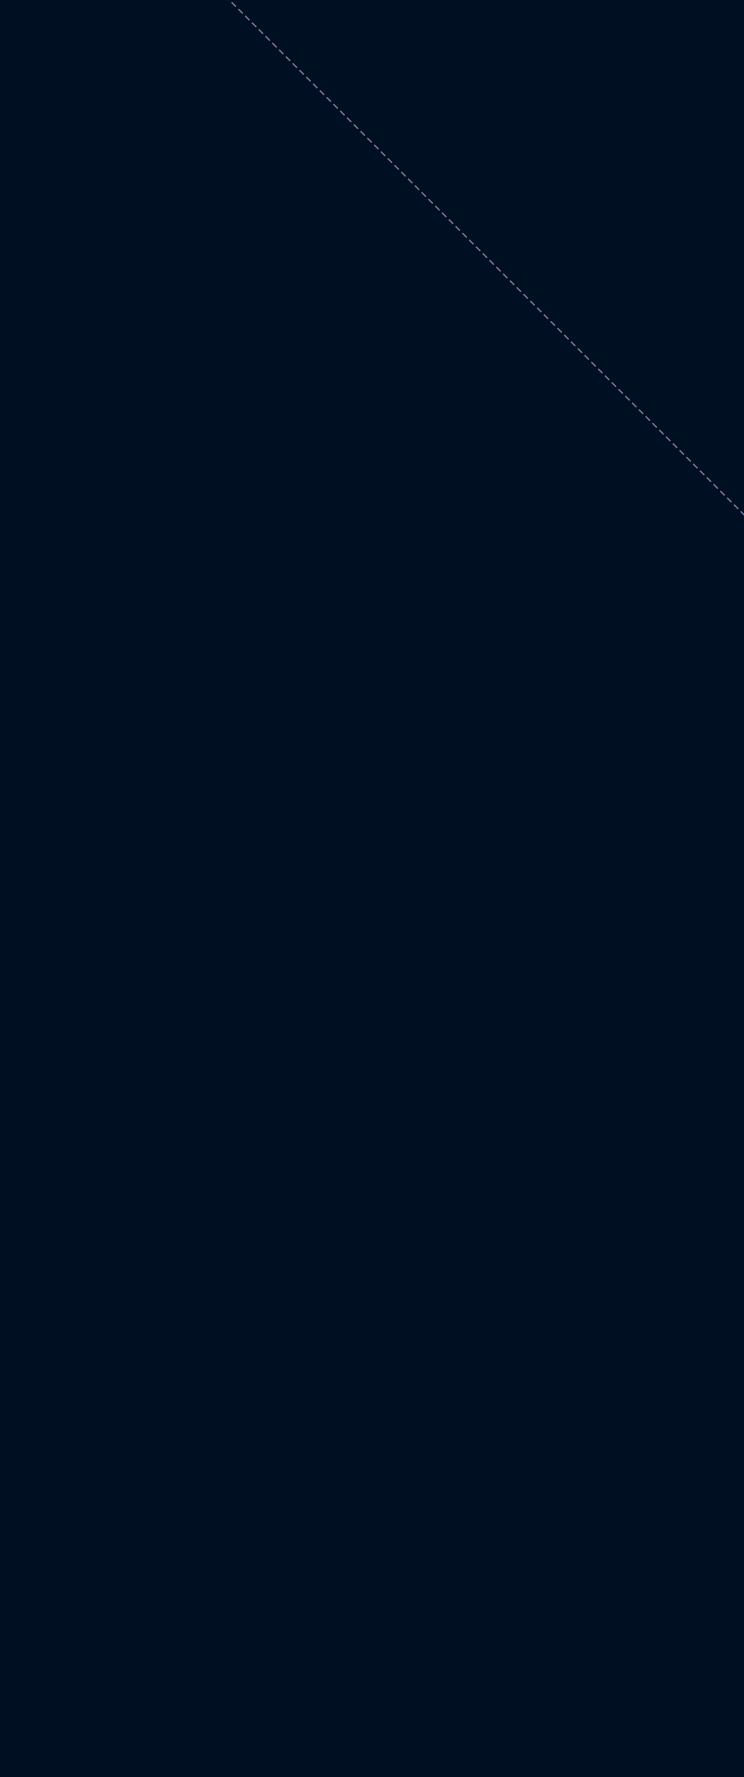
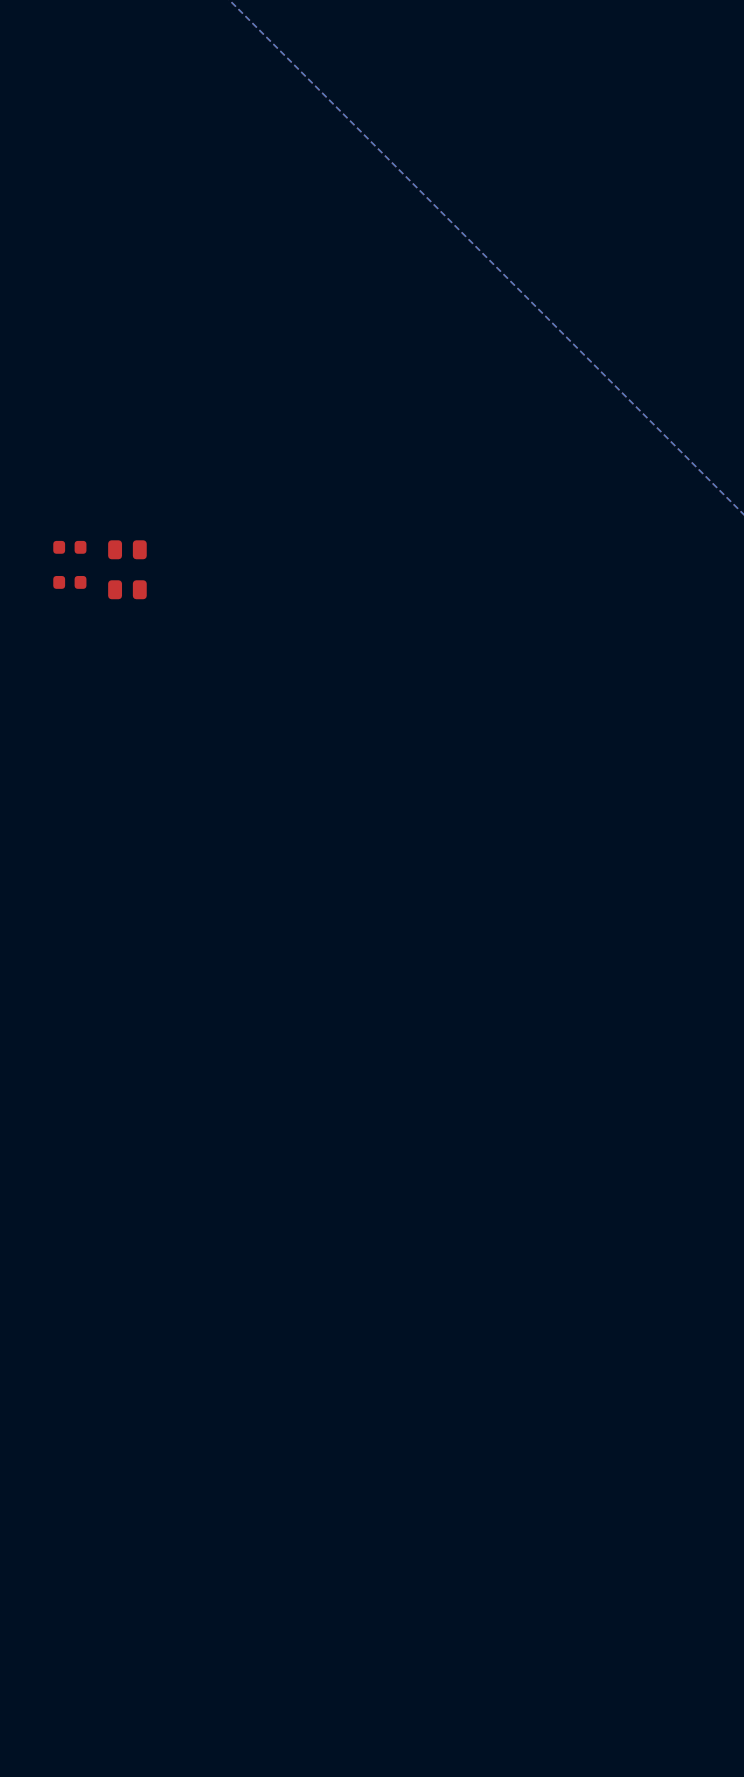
part: none -> (69, 547)
part: none -> (127, 549)
part: none -> (69, 582)
part: none -> (127, 589)

